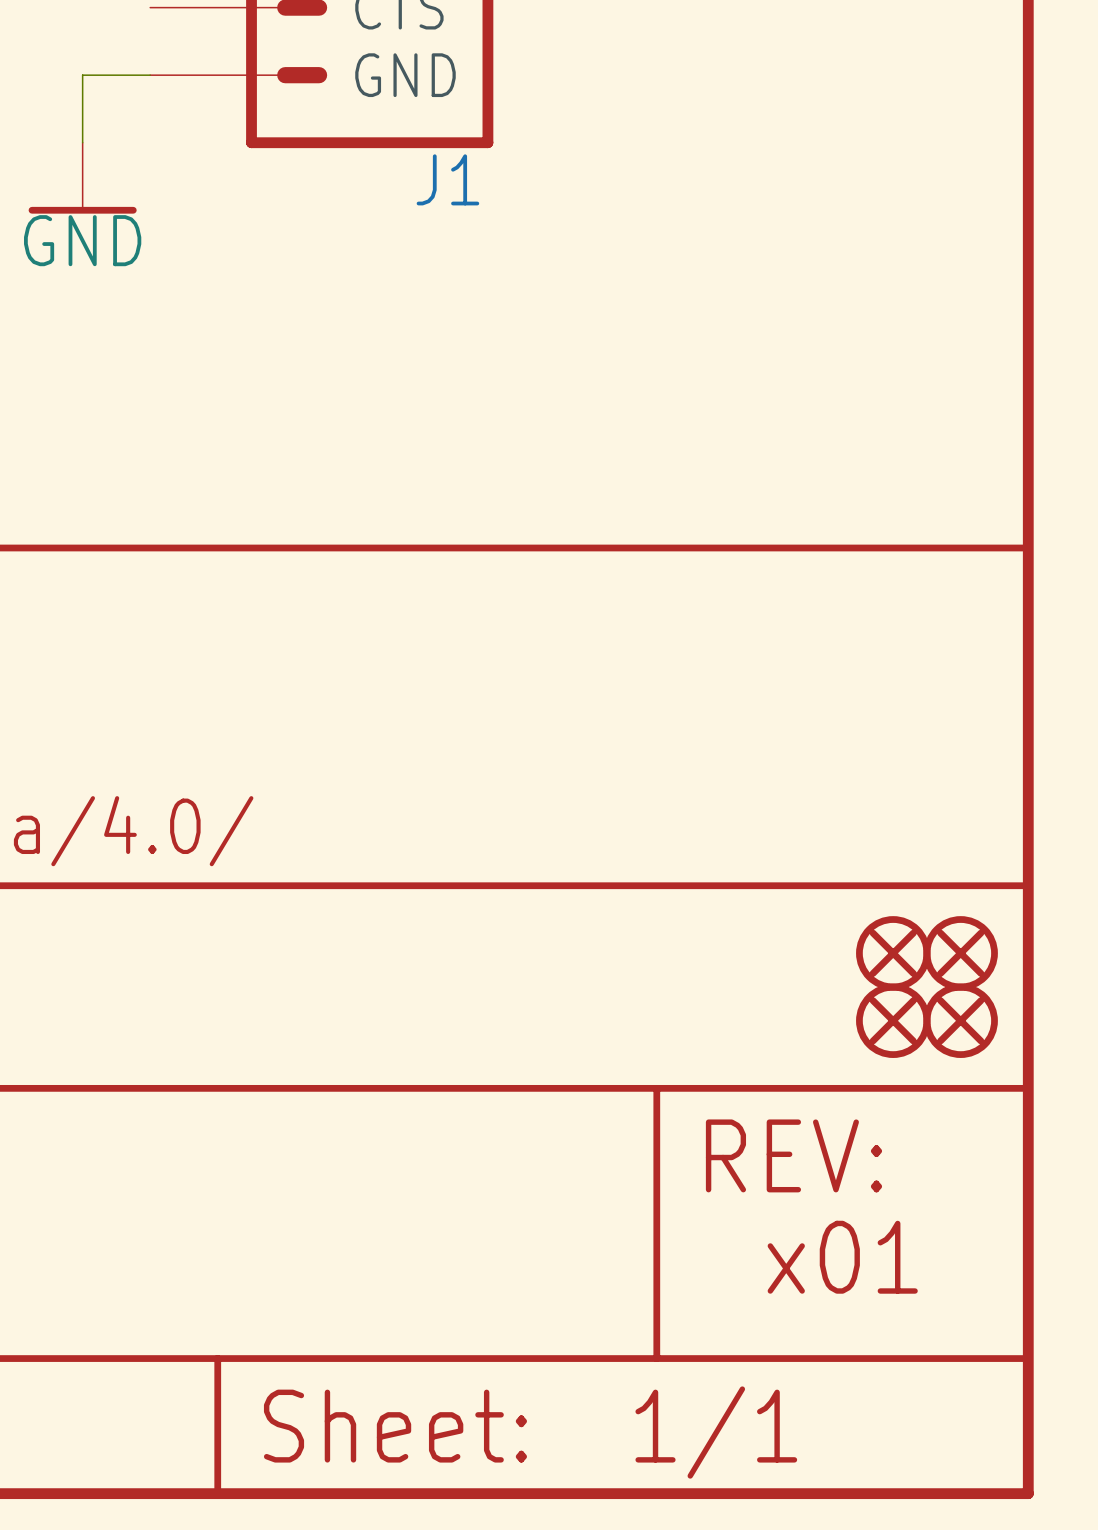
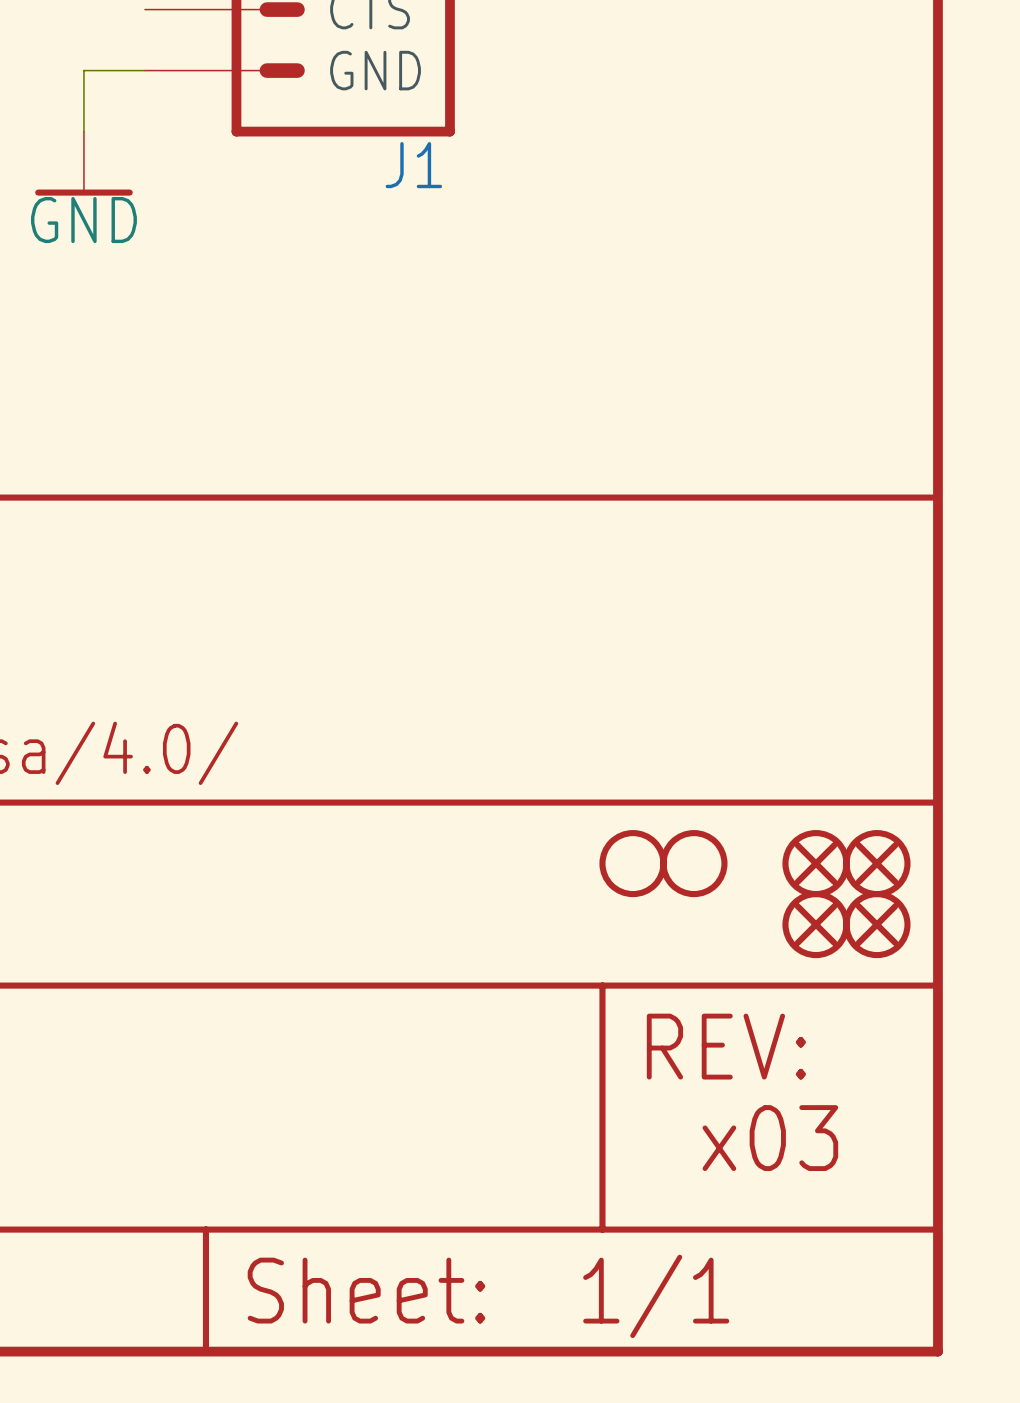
part: none -> (632, 863)
part: none -> (693, 863)
text: x01 (842, 1257) -> x03 (770, 1138)

